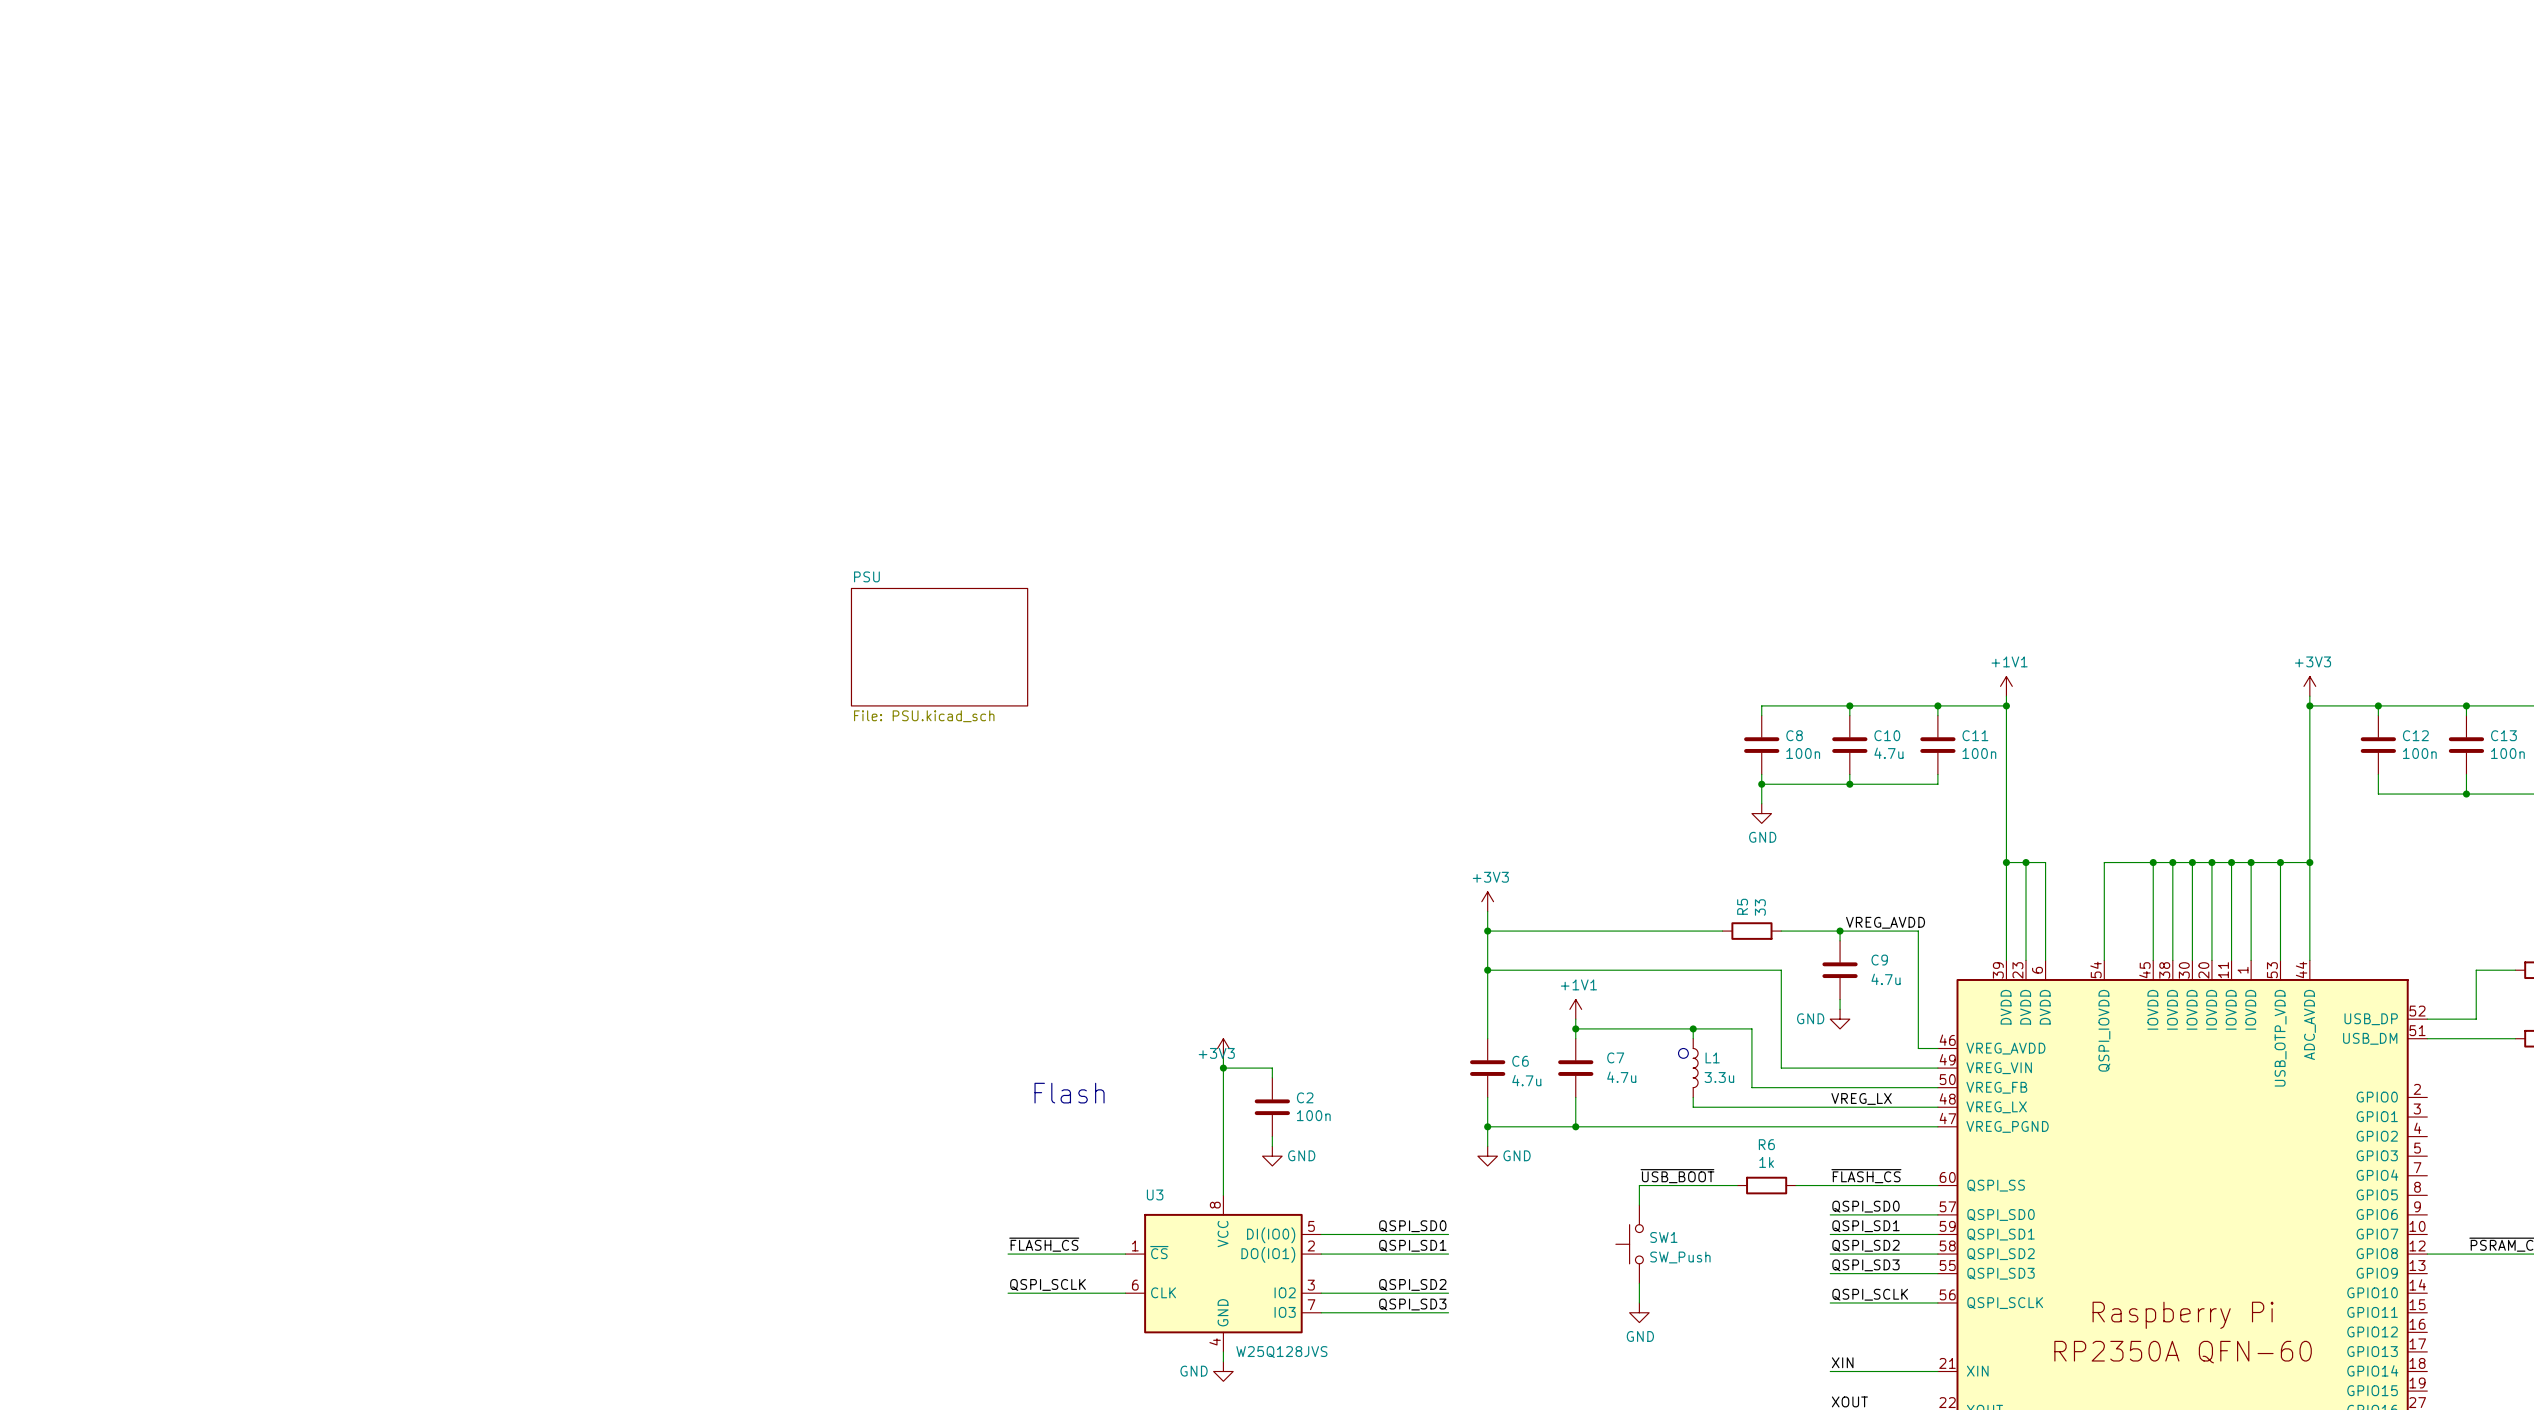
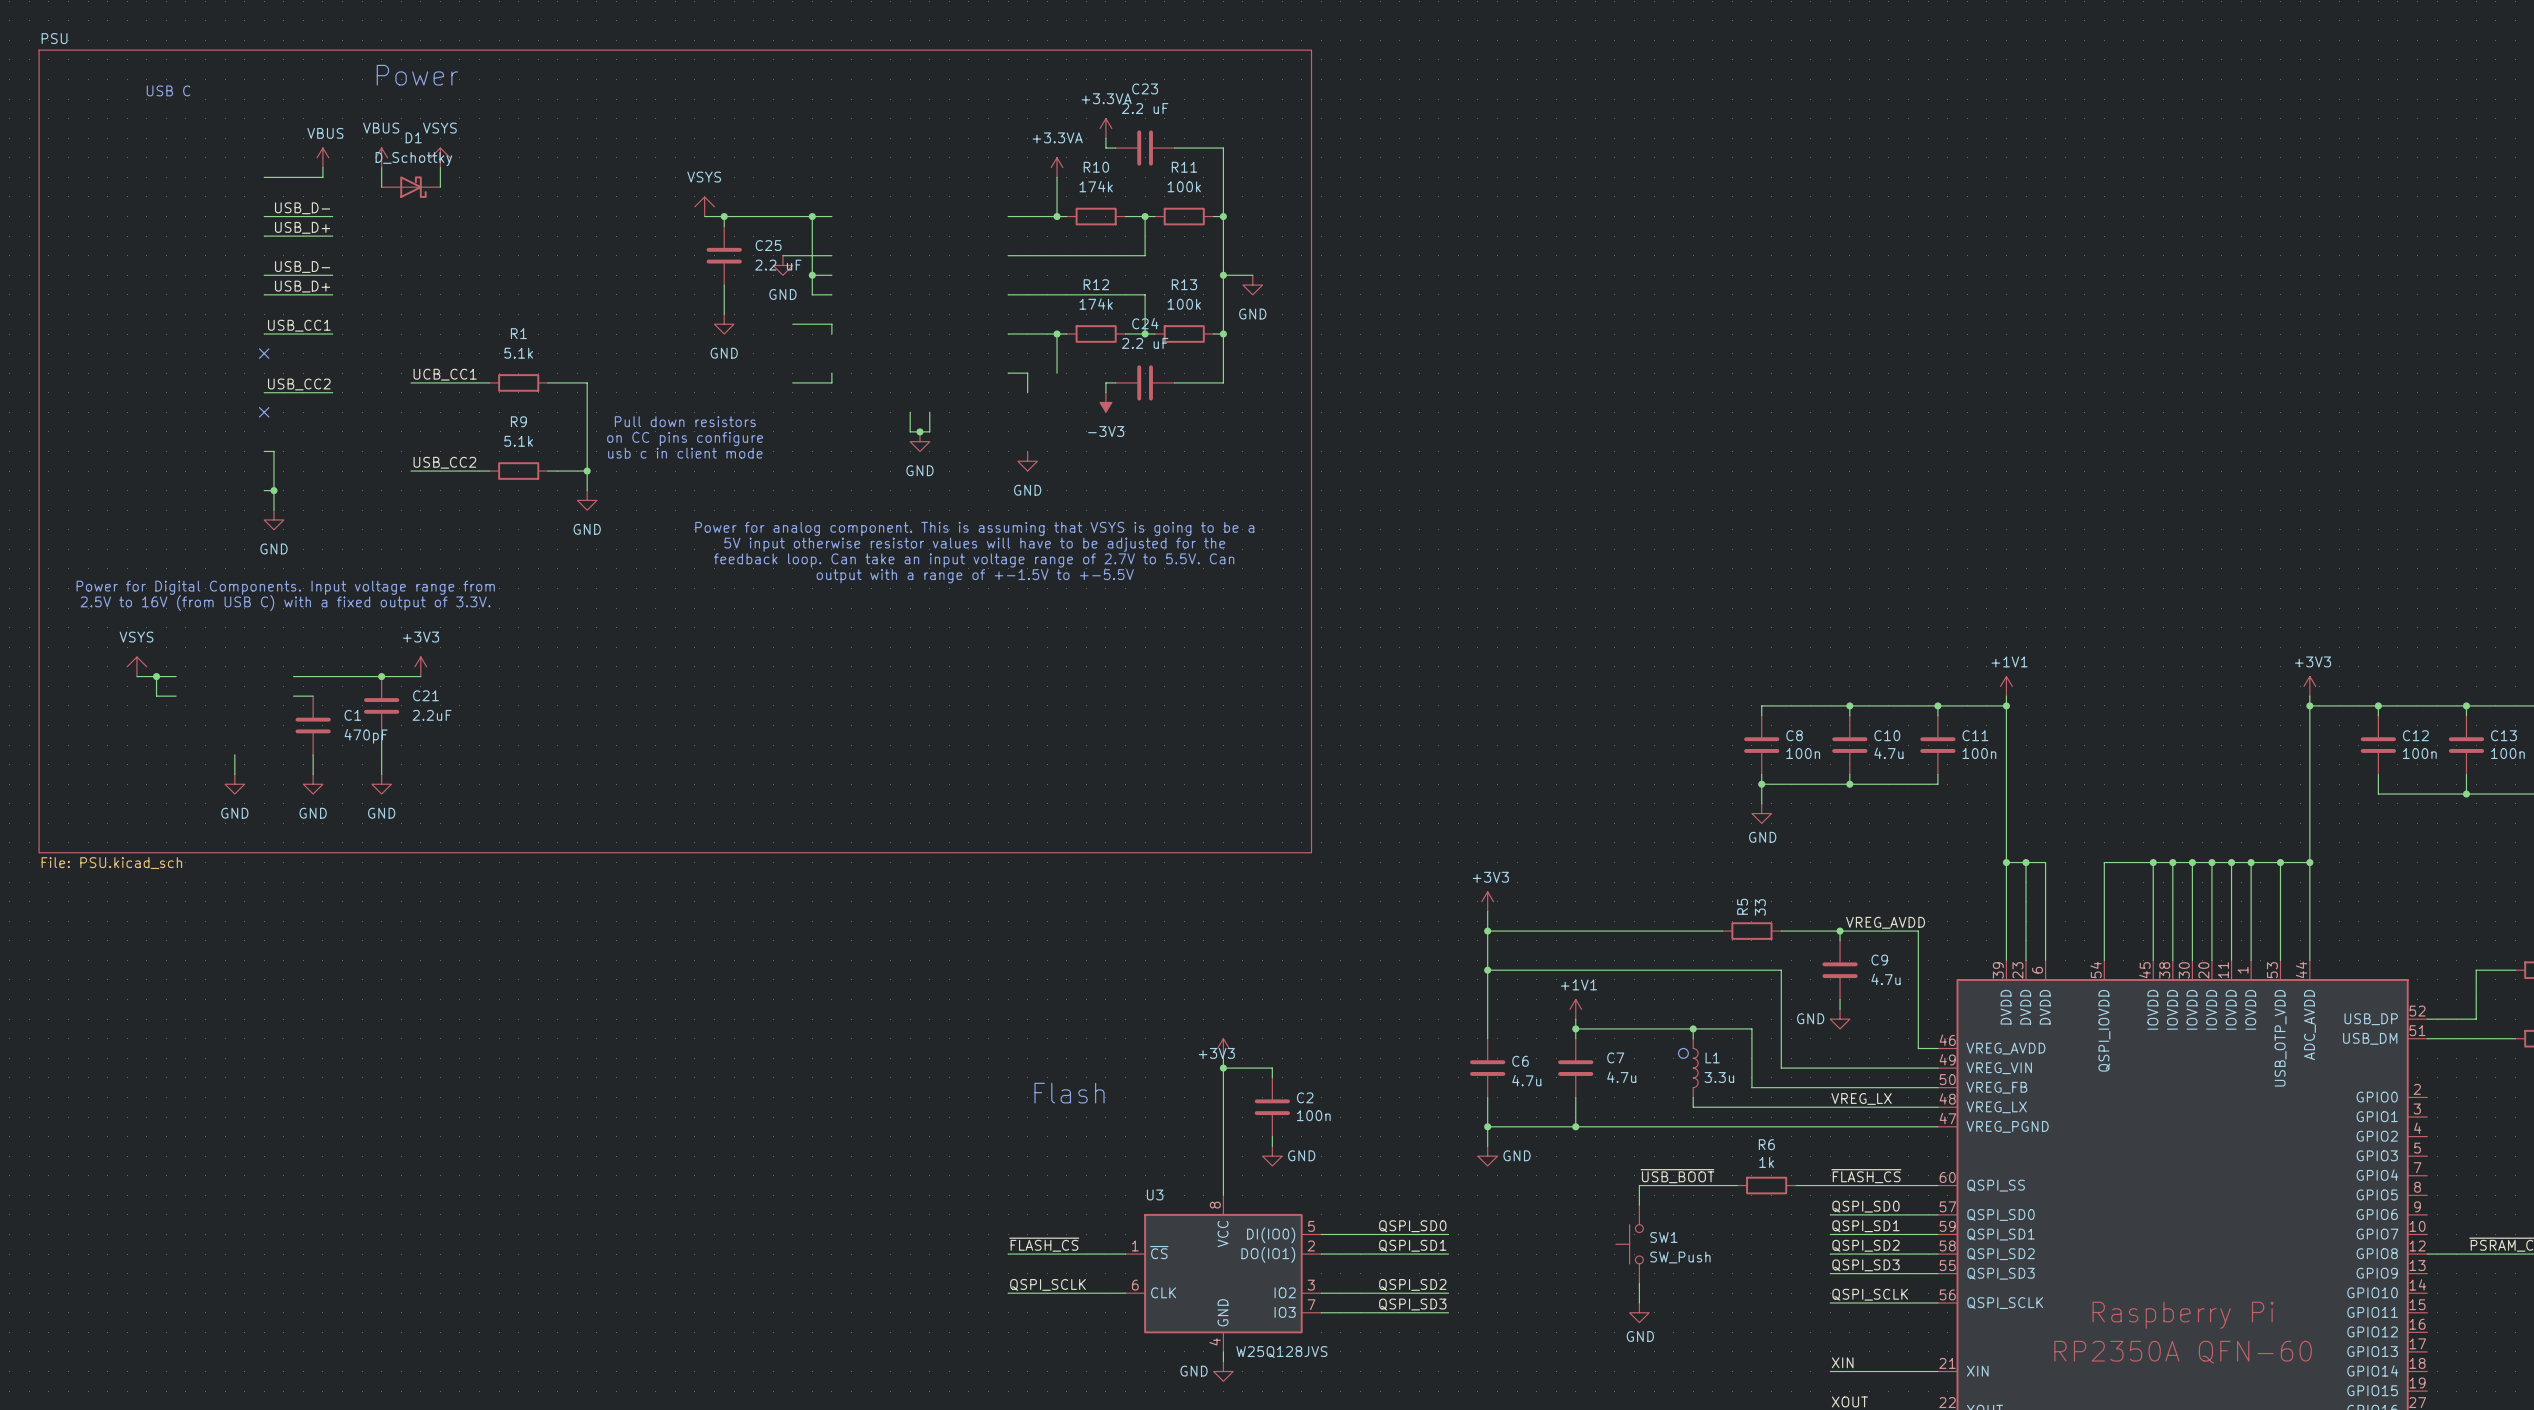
text: none -> Power (417, 75)
text: none -> USB C (168, 90)
power symbol: none -> +3.3VA (1105, 128)
wire: none -> (1105, 138) (1105, 148) (1115, 148)
C23: none -> 2.2 uF (1145, 148)
wire: none -> (1174, 148) (1223, 148) (1223, 382) (1174, 382)
power symbol: none -> VBUS (322, 157)
power symbol: none -> VBUS (381, 157)
power symbol: none -> VSYS (440, 157)
wire: none -> (322, 167) (322, 177) (264, 177)
wire: none -> (381, 167) (381, 187)
wire: none -> (440, 167) (440, 187)
power symbol: none -> +3.3VA (1057, 167)
wire: none -> (1057, 177) (1057, 216)
D1: none -> D_Schottky (411, 187)
power symbol: none -> VSYS (704, 206)
label: none -> USB_D- (302, 208)
wire: none -> (264, 216) (332, 216)
wire: none -> (704, 216) (831, 216)
wire: none -> (724, 216) (724, 226)
junction: none -> (724, 216)
wire: none -> (812, 216) (812, 294) (831, 294)
junction: none -> (812, 216)
wire: none -> (1008, 216) (1066, 216)
junction: none -> (1057, 216)
R10: none -> 174k (1096, 216)
wire: none -> (1125, 216) (1154, 216)
wire: none -> (1145, 216) (1145, 255) (1008, 255)
junction: none -> (1145, 216)
R11: none -> 100k (1184, 216)
wire: none -> (1213, 216) (1223, 216)
junction: none -> (1223, 216)
label: none -> USB_D+ (302, 227)
wire: none -> (264, 236) (332, 236)
C25: none -> 2.2 uF (724, 255)
wire: none -> (782, 255) (831, 255)
power symbol: none -> GND (782, 265)
label: none -> USB_D- (302, 267)
wire: none -> (264, 275) (332, 275)
wire: none -> (812, 275) (831, 275)
junction: none -> (812, 275)
wire: none -> (1223, 275) (1252, 275)
junction: none -> (1223, 275)
wire: none -> (724, 285) (724, 314)
power symbol: none -> GND (1252, 285)
label: none -> USB_D+ (302, 286)
wire: none -> (264, 294) (332, 294)
wire: none -> (1008, 294) (1145, 294) (1145, 334)
power symbol: none -> GND (724, 324)
wire: none -> (792, 324) (831, 324) (831, 334)
label: none -> USB_CC1 (299, 325)
wire: none -> (264, 334) (332, 334)
wire: none -> (1008, 334) (1066, 334)
wire: none -> (1057, 334) (1057, 373)
junction: none -> (1057, 334)
R12: none -> 174k (1096, 334)
wire: none -> (1125, 334) (1154, 334)
junction: none -> (1145, 334)
R13: none -> 100k (1184, 334)
wire: none -> (1213, 334) (1223, 334)
junction: none -> (1223, 334)
no-connect mark: none -> (264, 353)
wire: none -> (831, 373) (831, 382) (792, 382)
wire: none -> (1008, 373) (1027, 373) (1027, 392)
label: none -> UCB_CC1 (445, 374)
wire: none -> (411, 382) (489, 382)
R1: none -> 5.1k (518, 382)
wire: none -> (548, 382) (587, 382) (587, 490)
wire: none -> (1115, 382) (1105, 382) (1105, 392)
C24: none -> 2.2 uF (1145, 382)
label: none -> USB_CC2 (299, 384)
wire: none -> (264, 392) (332, 392)
power symbol: none -> -3V3 (1105, 402)
no-connect mark: none -> (264, 412)
wire: none -> (910, 412) (910, 431) (929, 431) (929, 412)
text: none -> Pull down resistors (685, 421)
junction: none -> (919, 431)
text: none -> on CC pins configure (685, 439)
power symbol: none -> GND (919, 441)
wire: none -> (264, 451) (273, 451) (273, 510)
sheet PSU: none -> File: PSU.kicad_sch (675, 451)
text: none -> usb c in client mode (685, 453)
power symbol: none -> GND (1027, 461)
label: none -> USB_CC2 (444, 462)
wire: none -> (411, 471) (489, 471)
R9: none -> 5.1k (518, 471)
wire: none -> (548, 471) (587, 471)
junction: none -> (587, 471)
wire: none -> (264, 490) (273, 490)
junction: none -> (273, 490)
power symbol: none -> GND (587, 500)
power symbol: none -> GND (273, 519)
text: none -> Power for analog component. This is assuming that VSYS is going to be a (974, 528)
text: none -> 5V input otherwise resistor values will have to be adjusted for the (974, 544)
text: none -> feedback loop. Can take an input voltage range of 2.7V to 5.5V. Can (974, 560)
text: none -> output with a range of +-1.5V to +-5.5V (975, 576)
text: none -> Power for Digital Components. Input voltage range from (285, 587)
text: none -> 2.5V to 16V (from USB C) with a fixed output of 3.3V. (285, 603)
sheet PSU: File: PSU.kicad_sch (939, 647) -> none
power symbol: none -> VSYS (136, 666)
power symbol: none -> +3V3 (420, 666)
wire: none -> (136, 676) (176, 676)
wire: none -> (156, 676) (156, 696) (176, 696)
junction: none -> (156, 676)
wire: none -> (293, 676) (420, 676)
junction: none -> (381, 676)
wire: none -> (293, 696) (313, 696)
C21: none -> 2.2uF (381, 705)
C1: none -> 470pF (313, 725)
wire: none -> (381, 735) (381, 774)
wire: none -> (234, 754) (234, 774)
wire: none -> (313, 754) (313, 774)
power symbol: none -> GND (234, 784)
power symbol: none -> GND (313, 784)
power symbol: none -> GND (381, 784)

